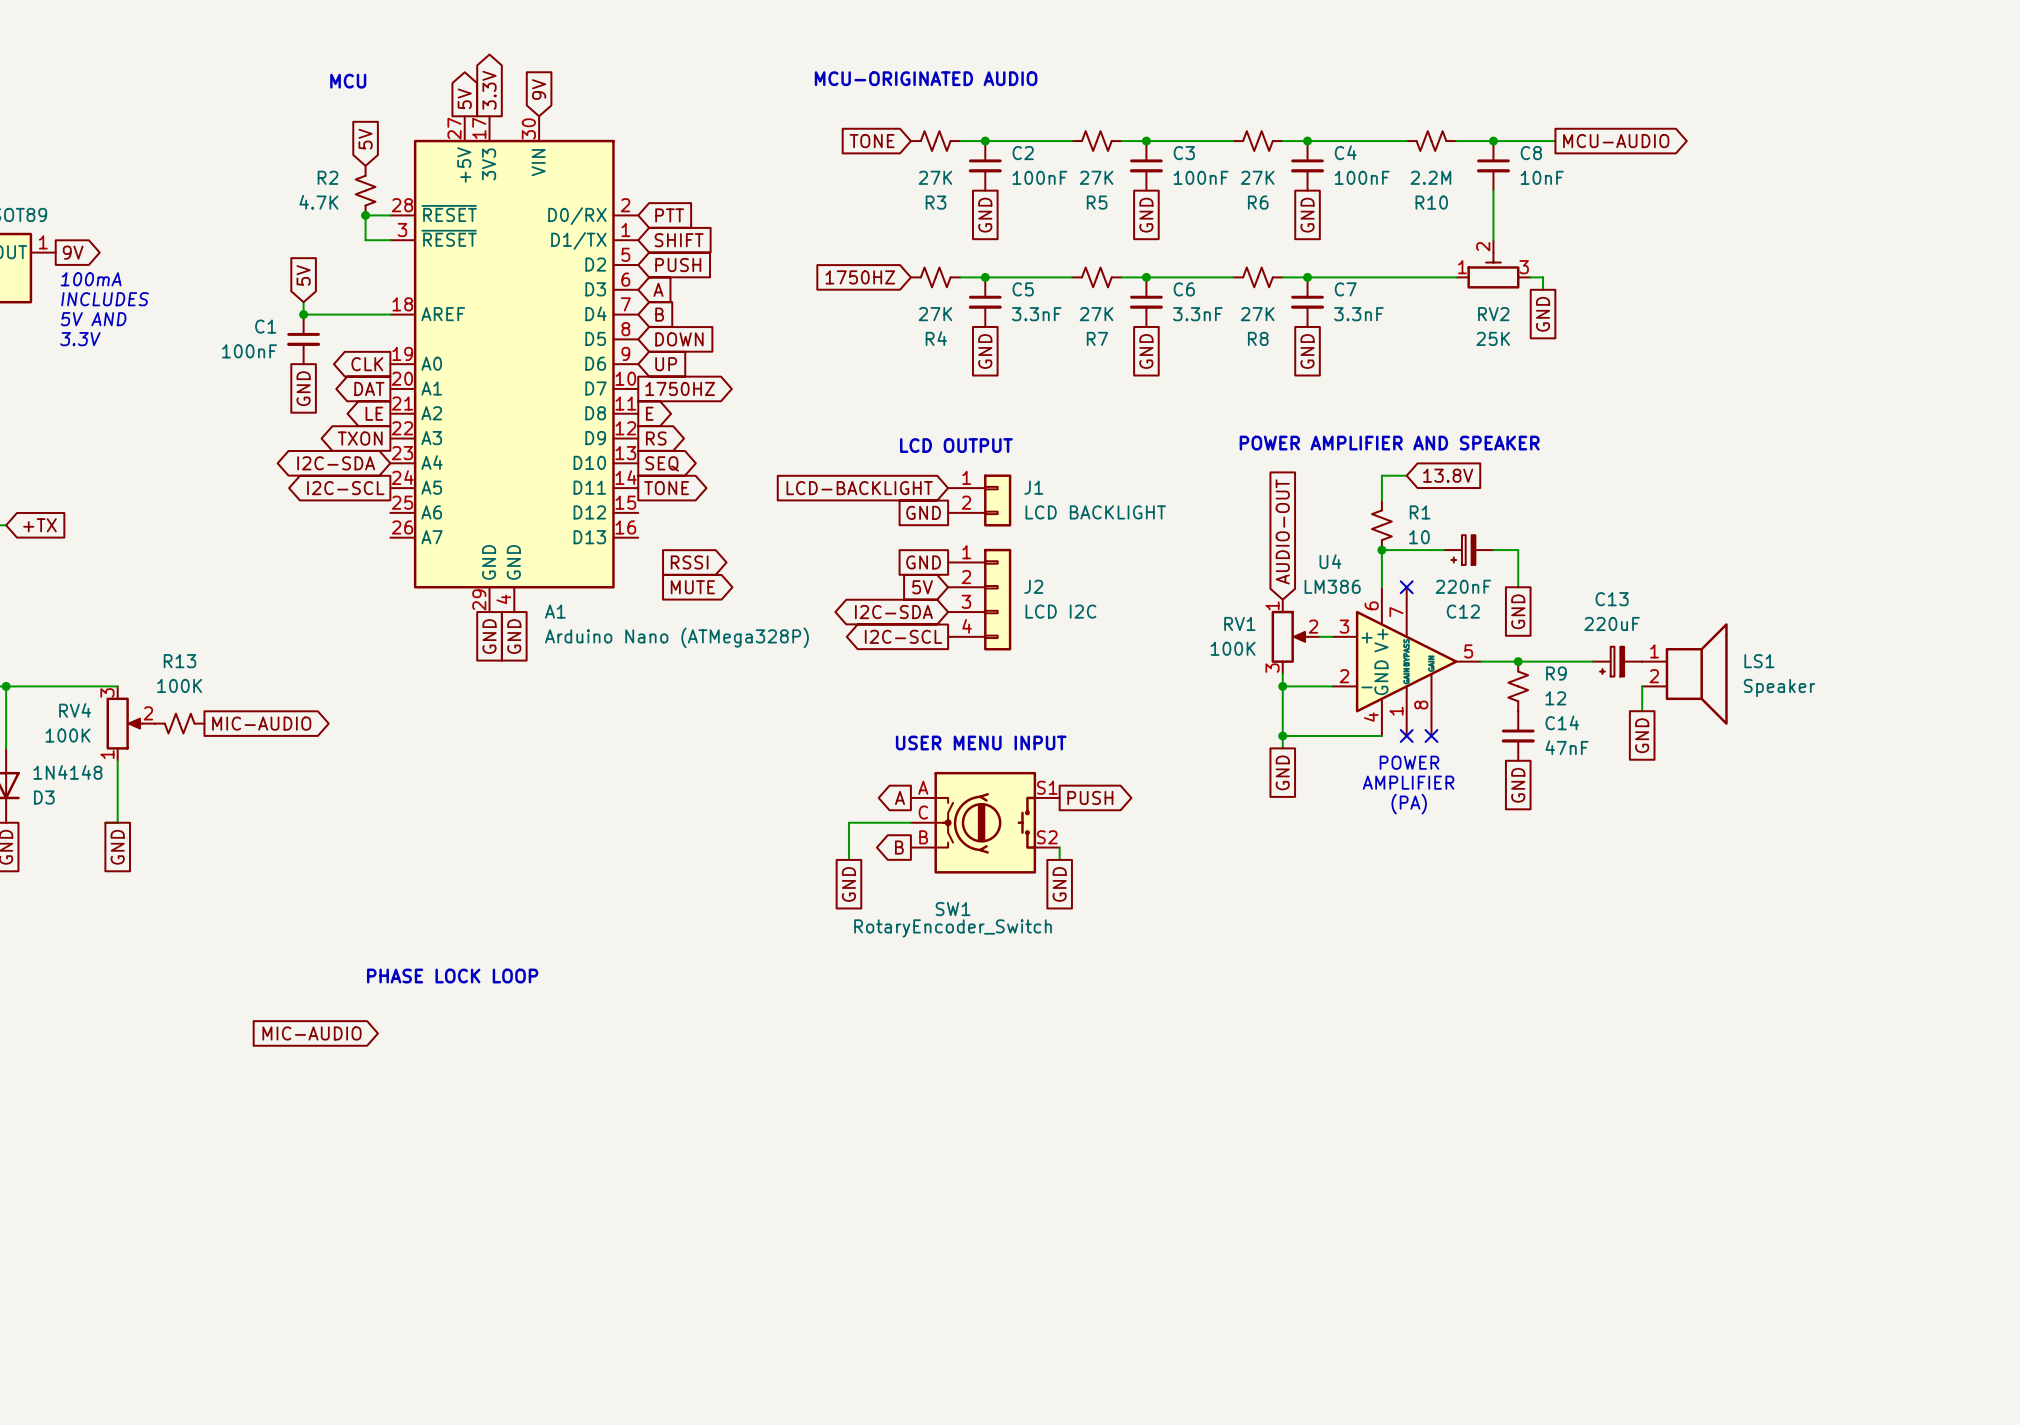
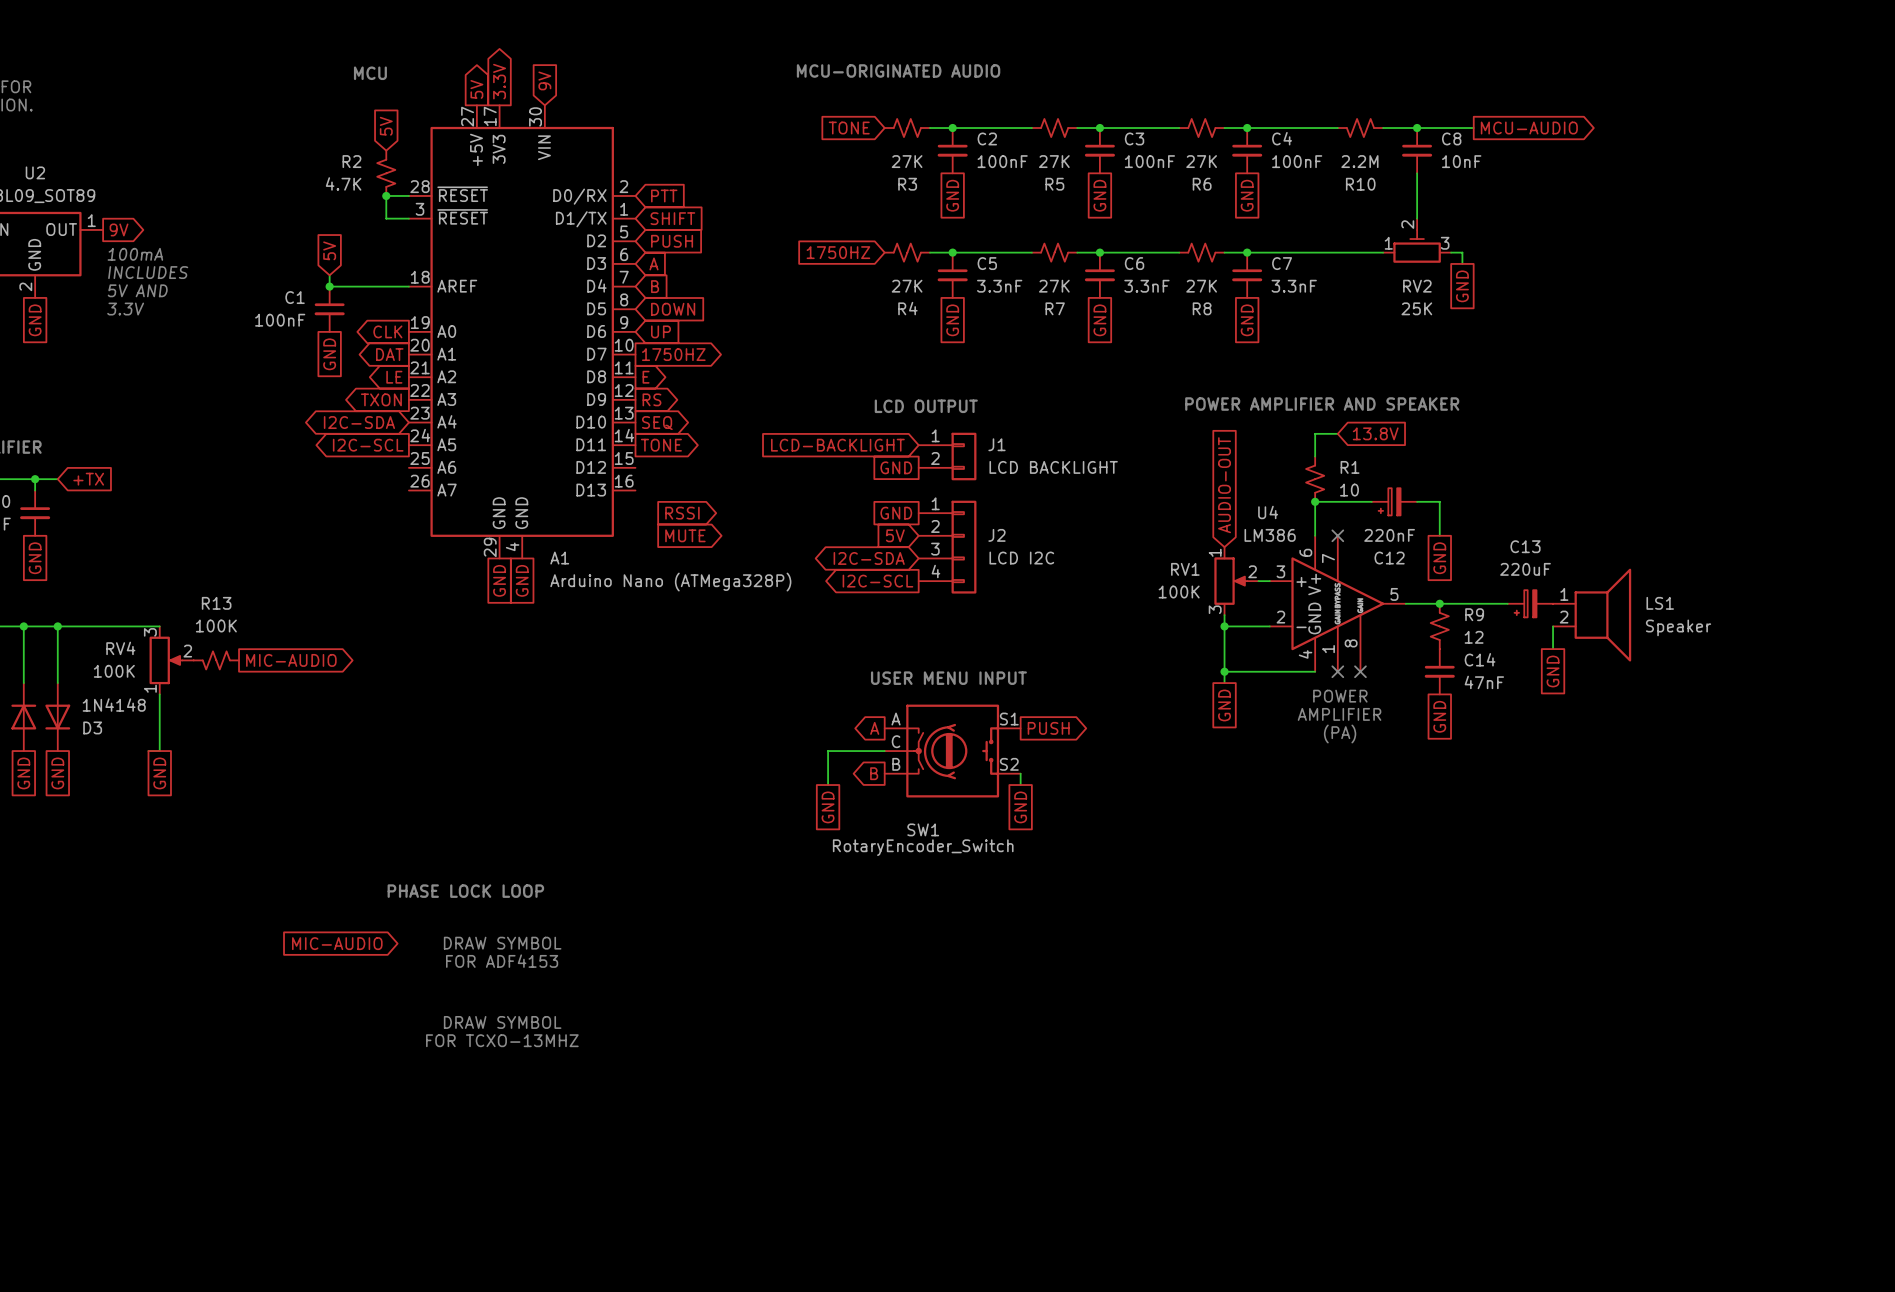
text: none -> DRAW SYMBOL (502, 943)
text: none -> FOR ADF4153 (502, 961)
text: none -> DRAW SYMBOL (502, 1022)
text: none -> FOR TCXO-13MHZ (502, 1040)

